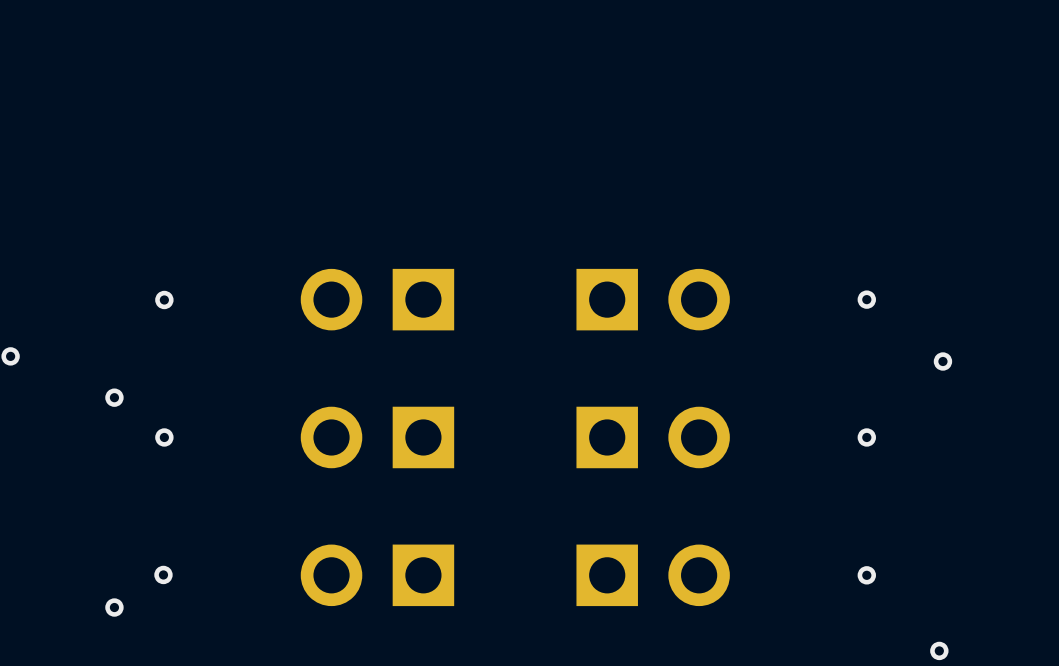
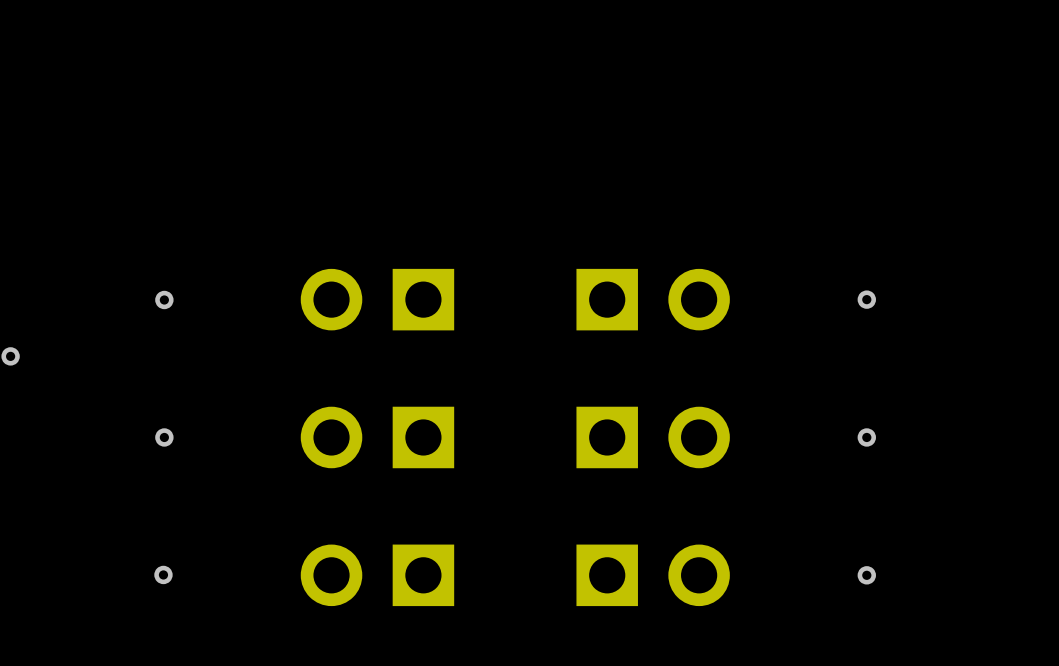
via: (942, 361) -> none
via: (114, 397) -> none
via: (114, 607) -> none
via: (939, 650) -> none

